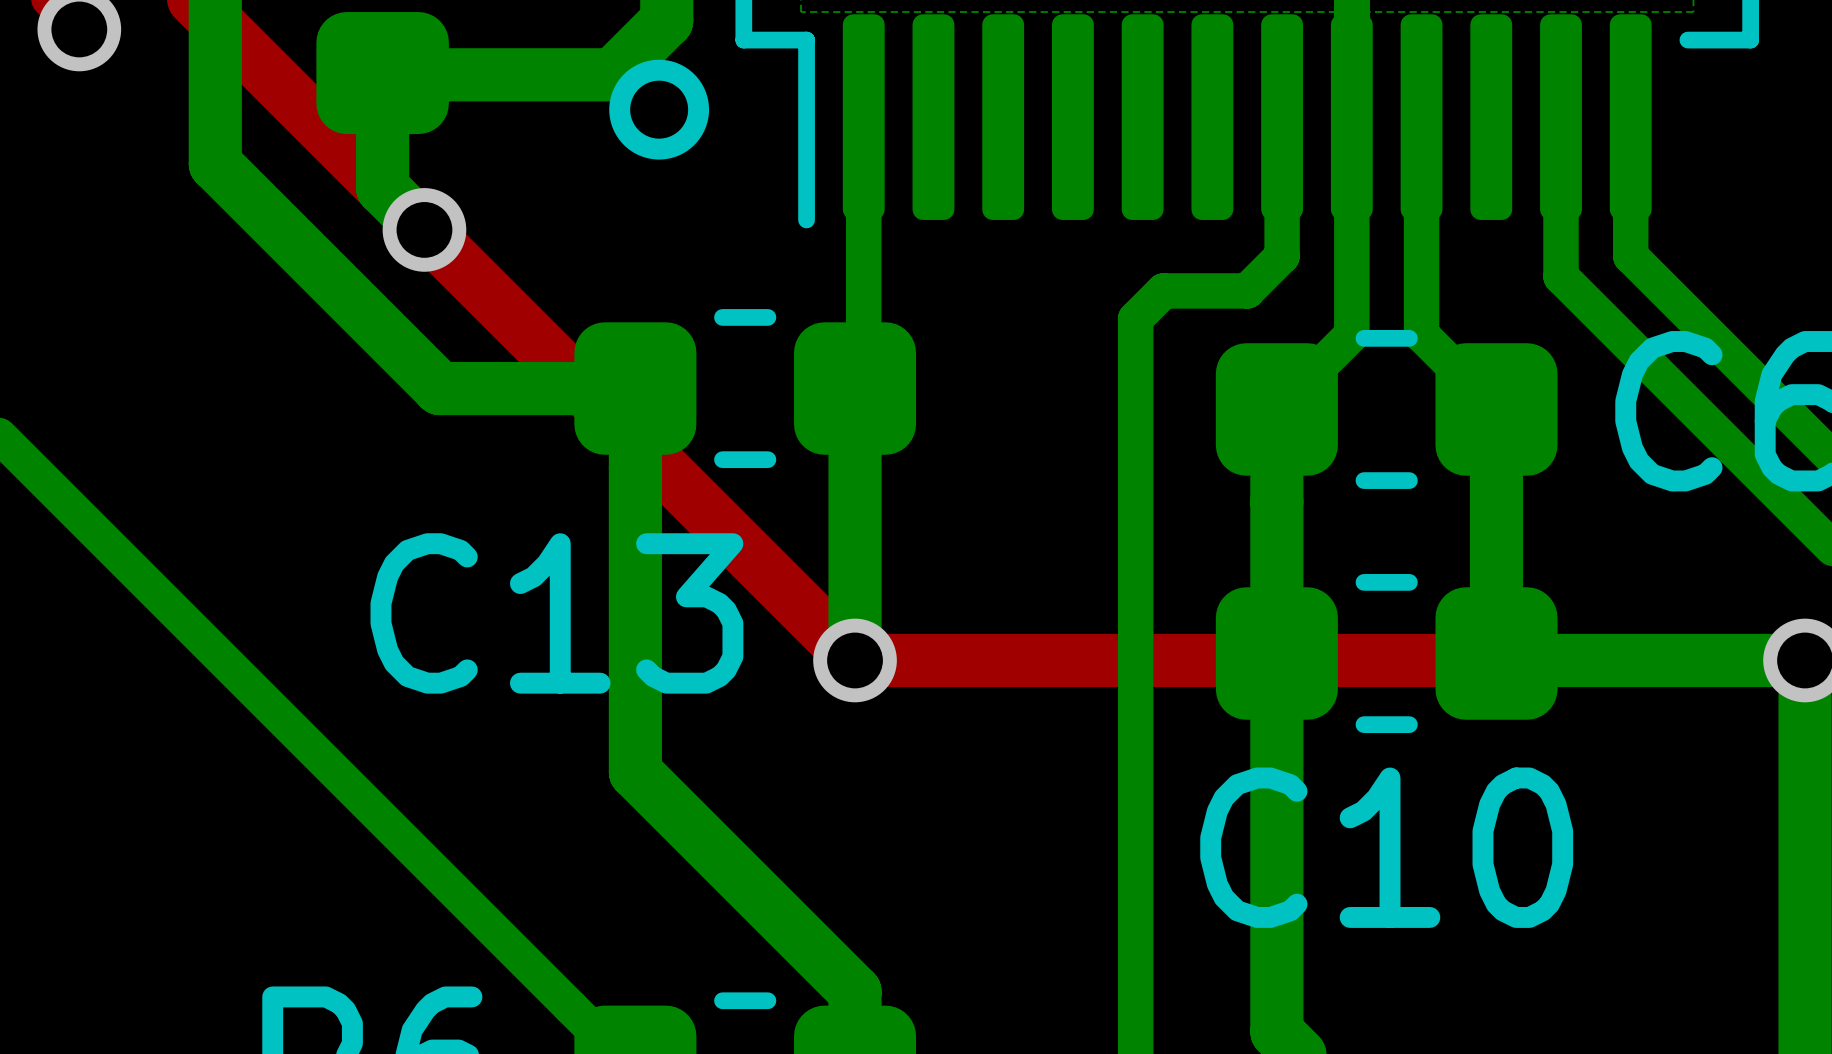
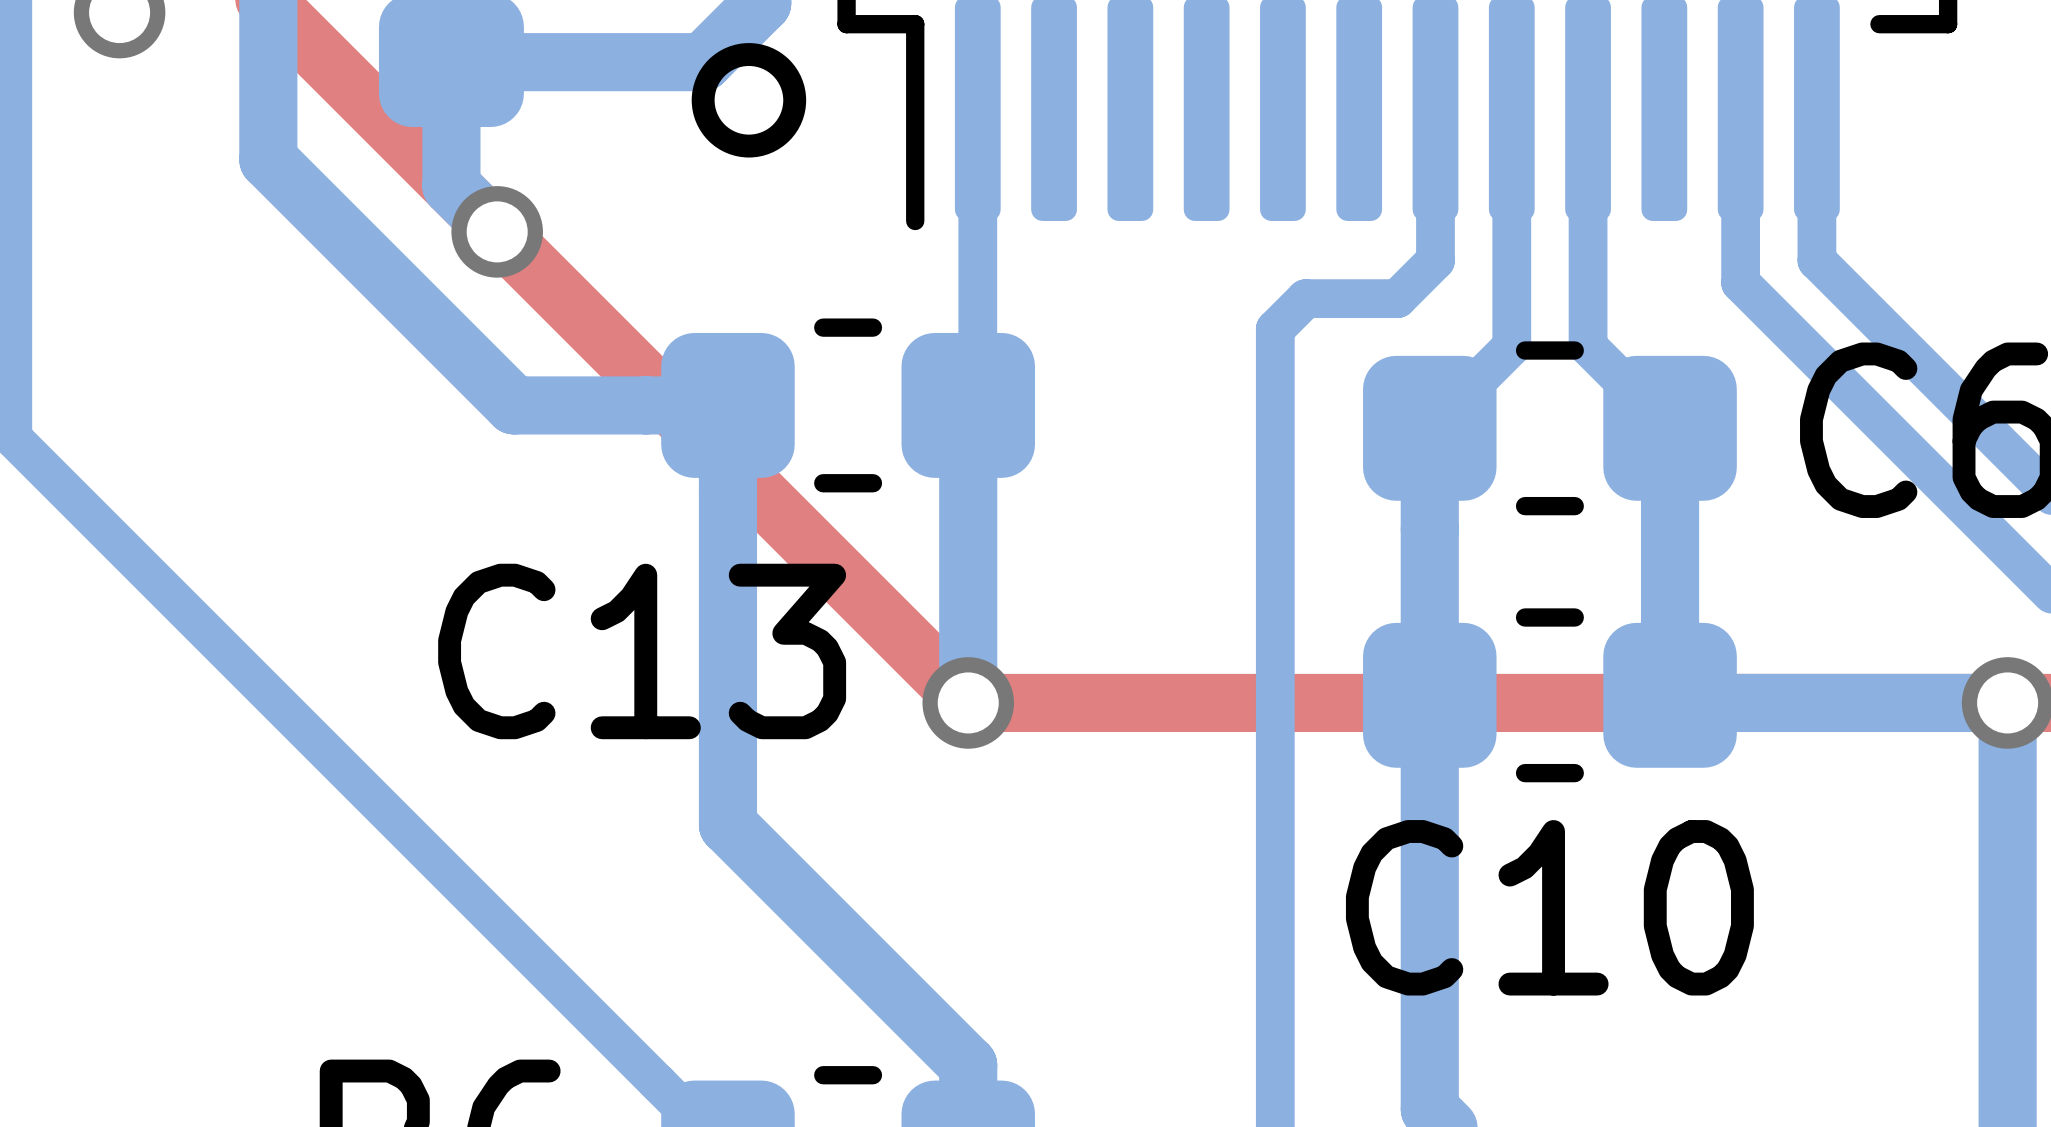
drawing shape: [609, 59, 710, 160] -> [691, 43, 807, 158]

